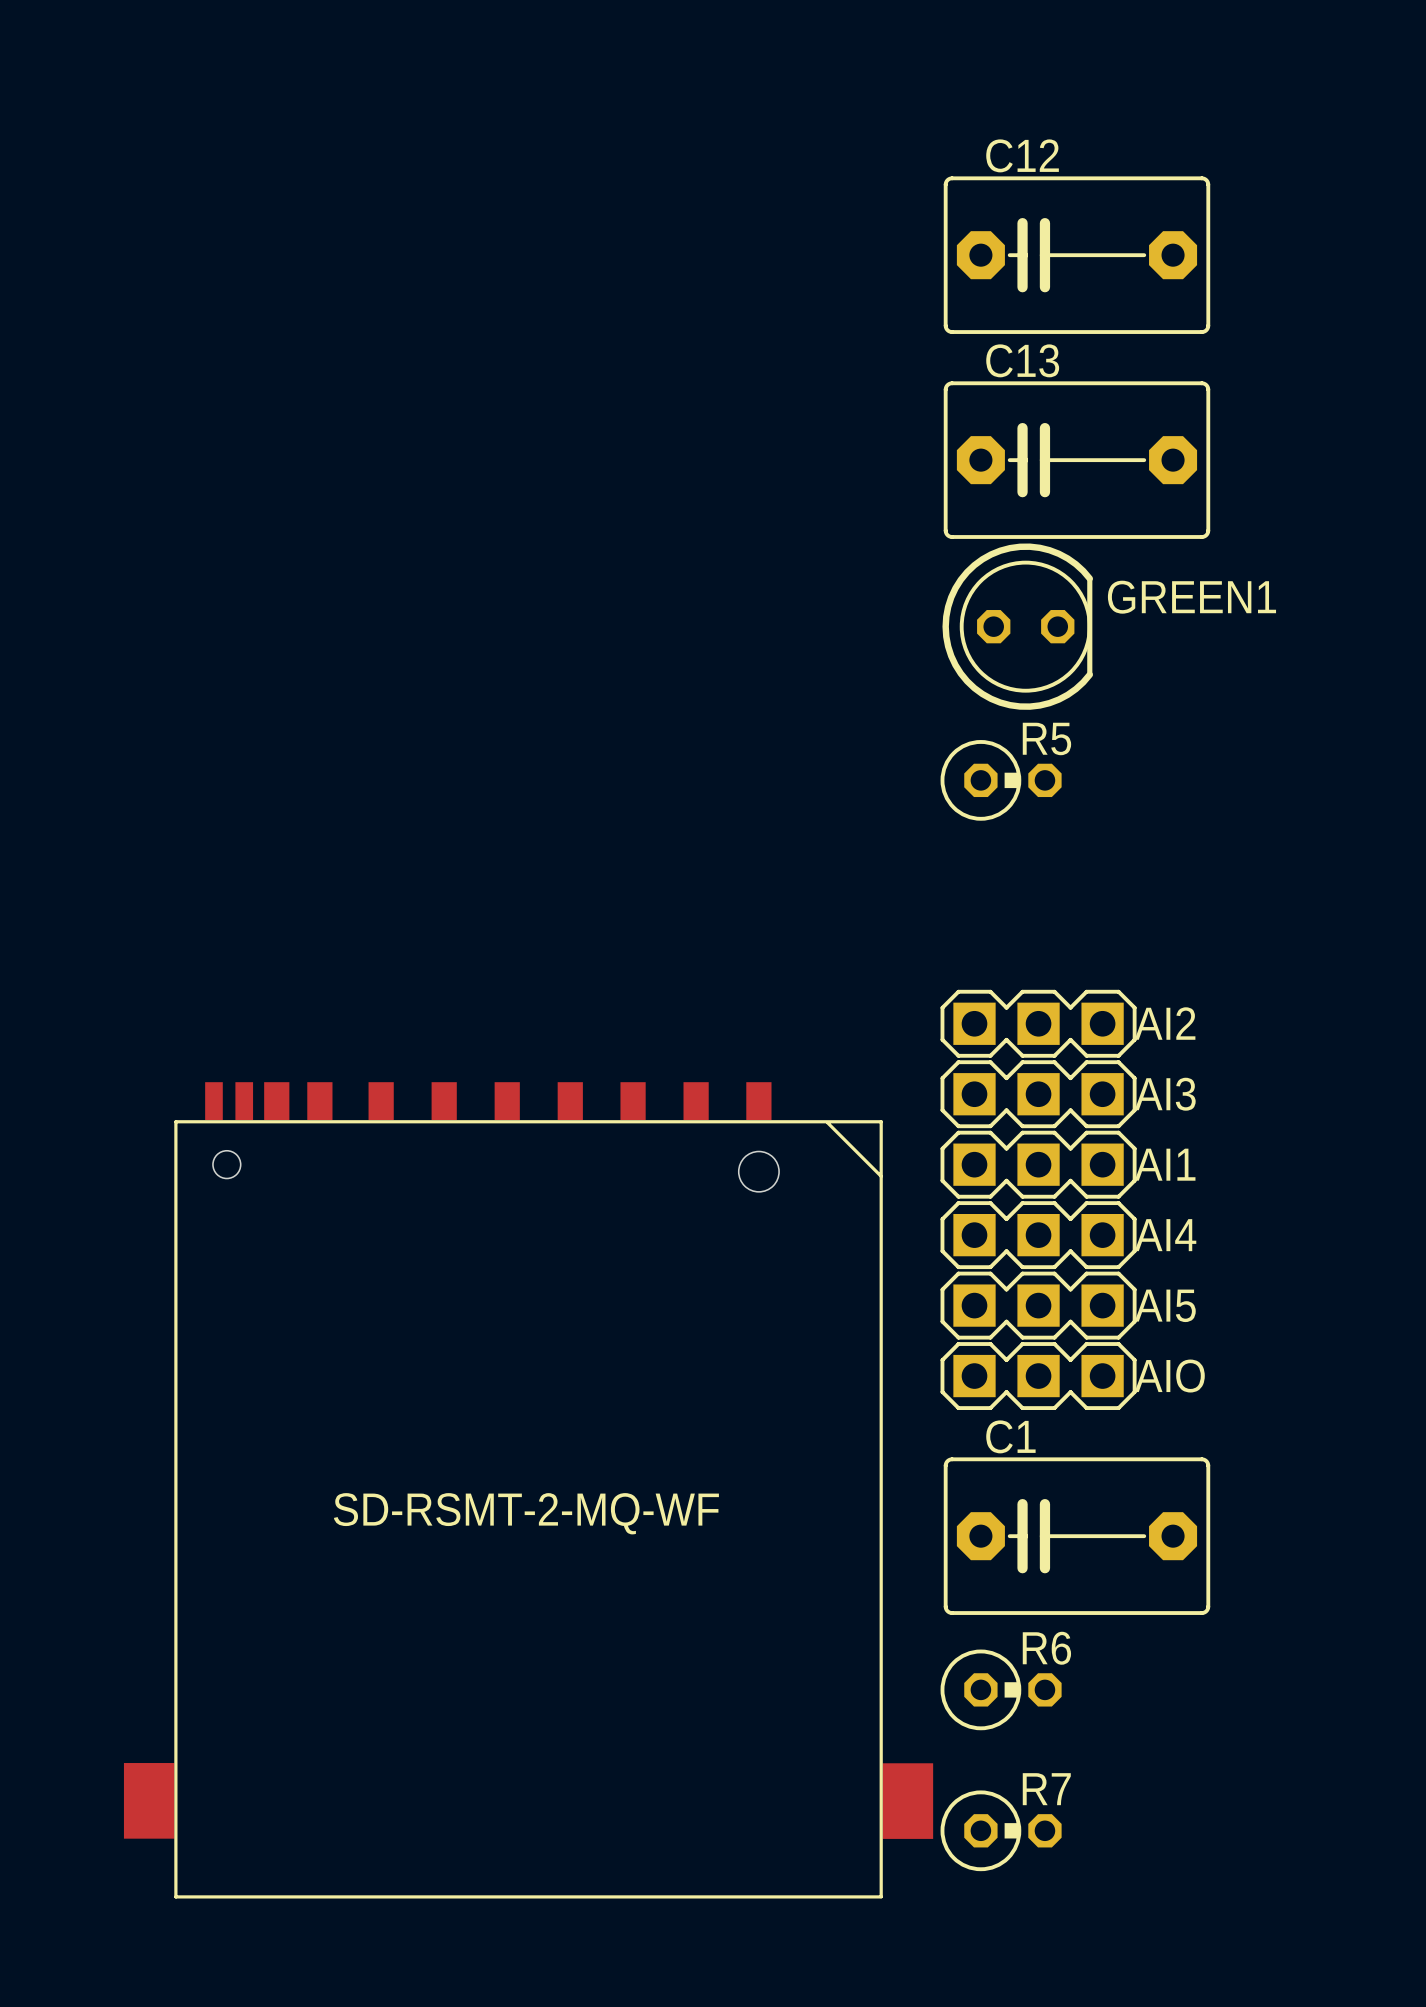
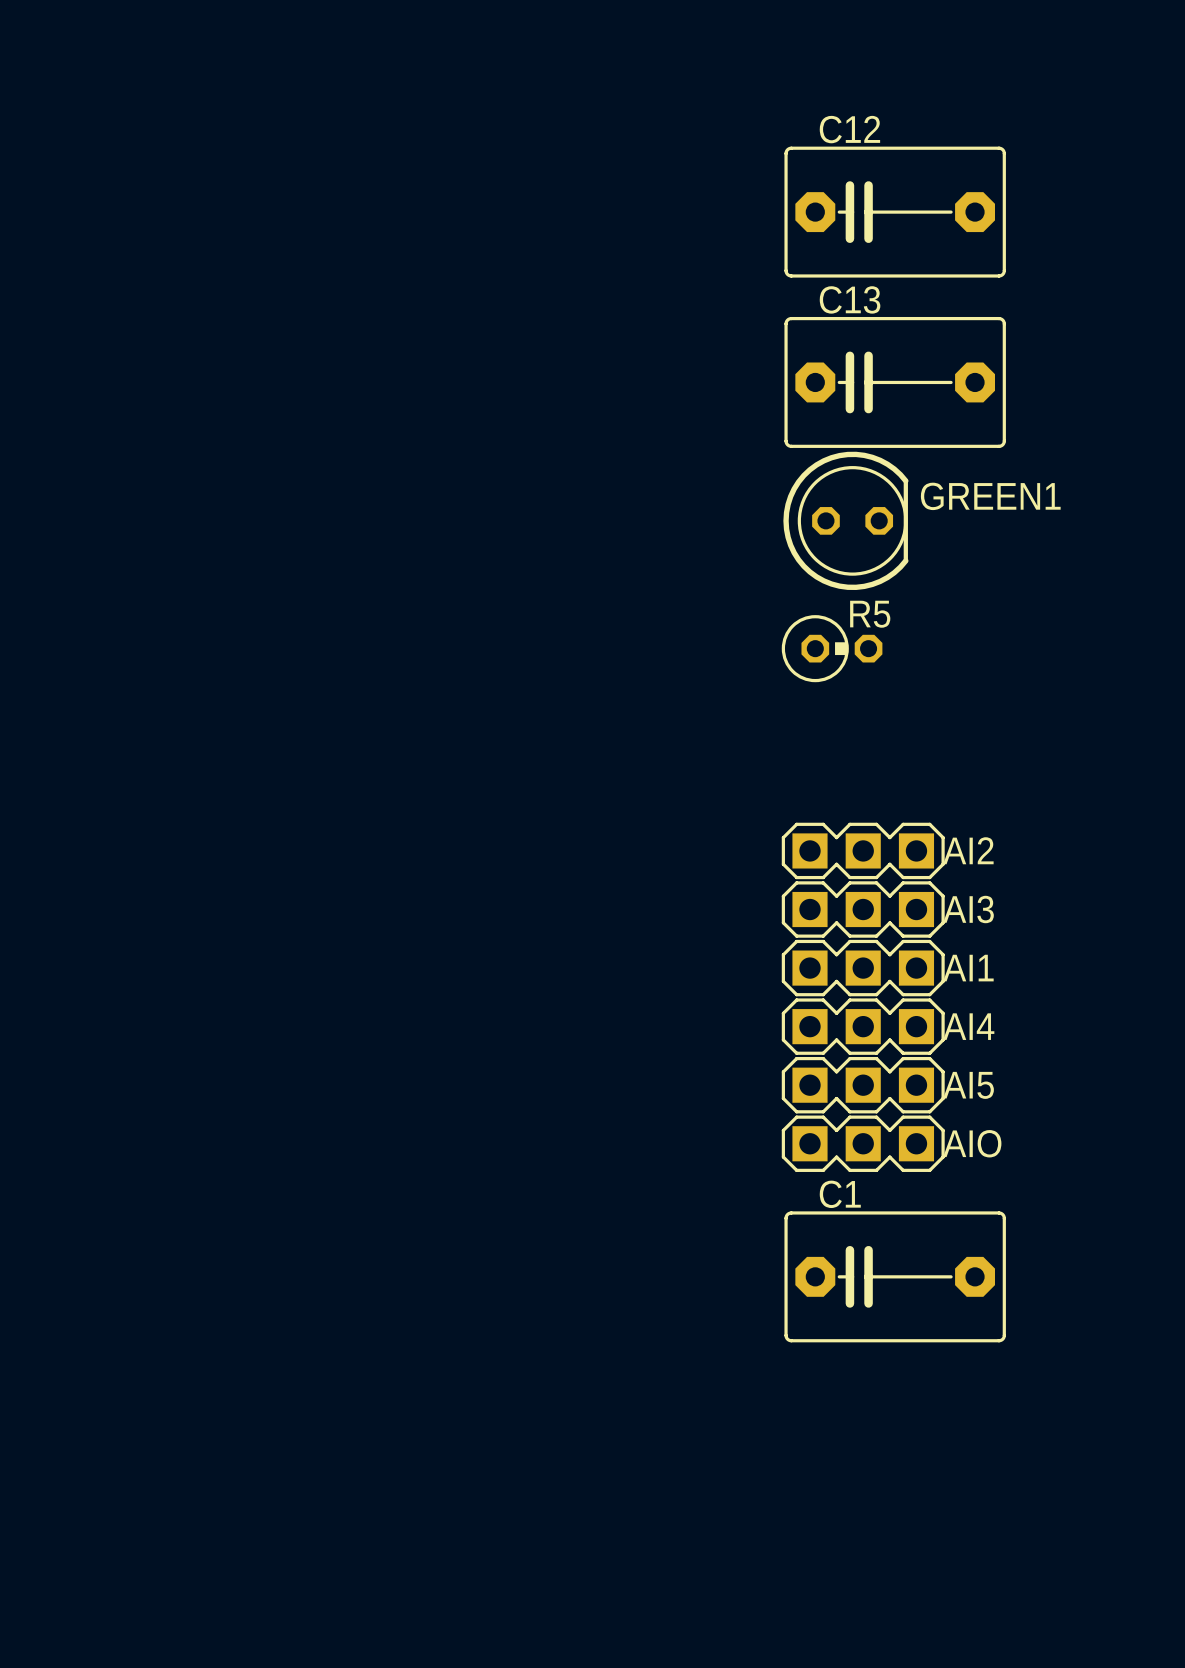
part: (528, 1490) -> none
R6: (1001, 1689) -> none
R7: (1001, 1830) -> none

